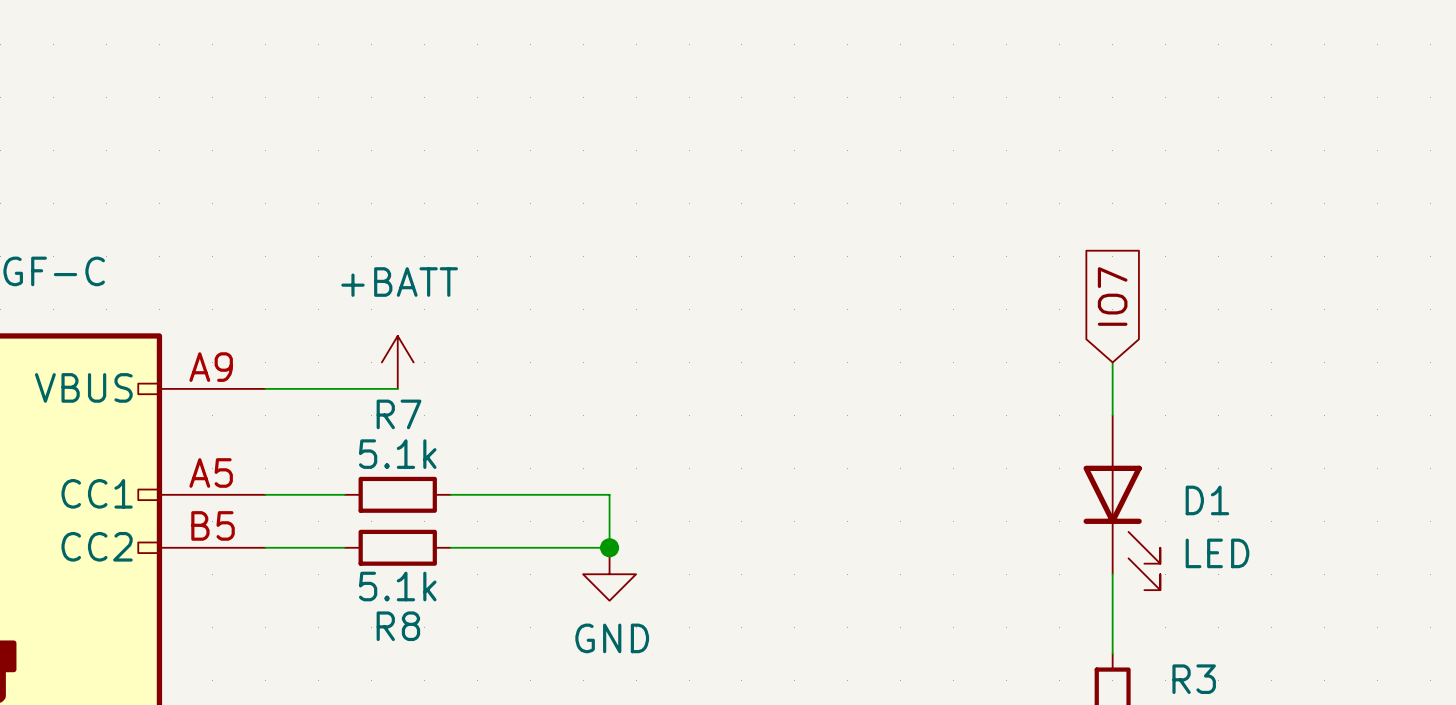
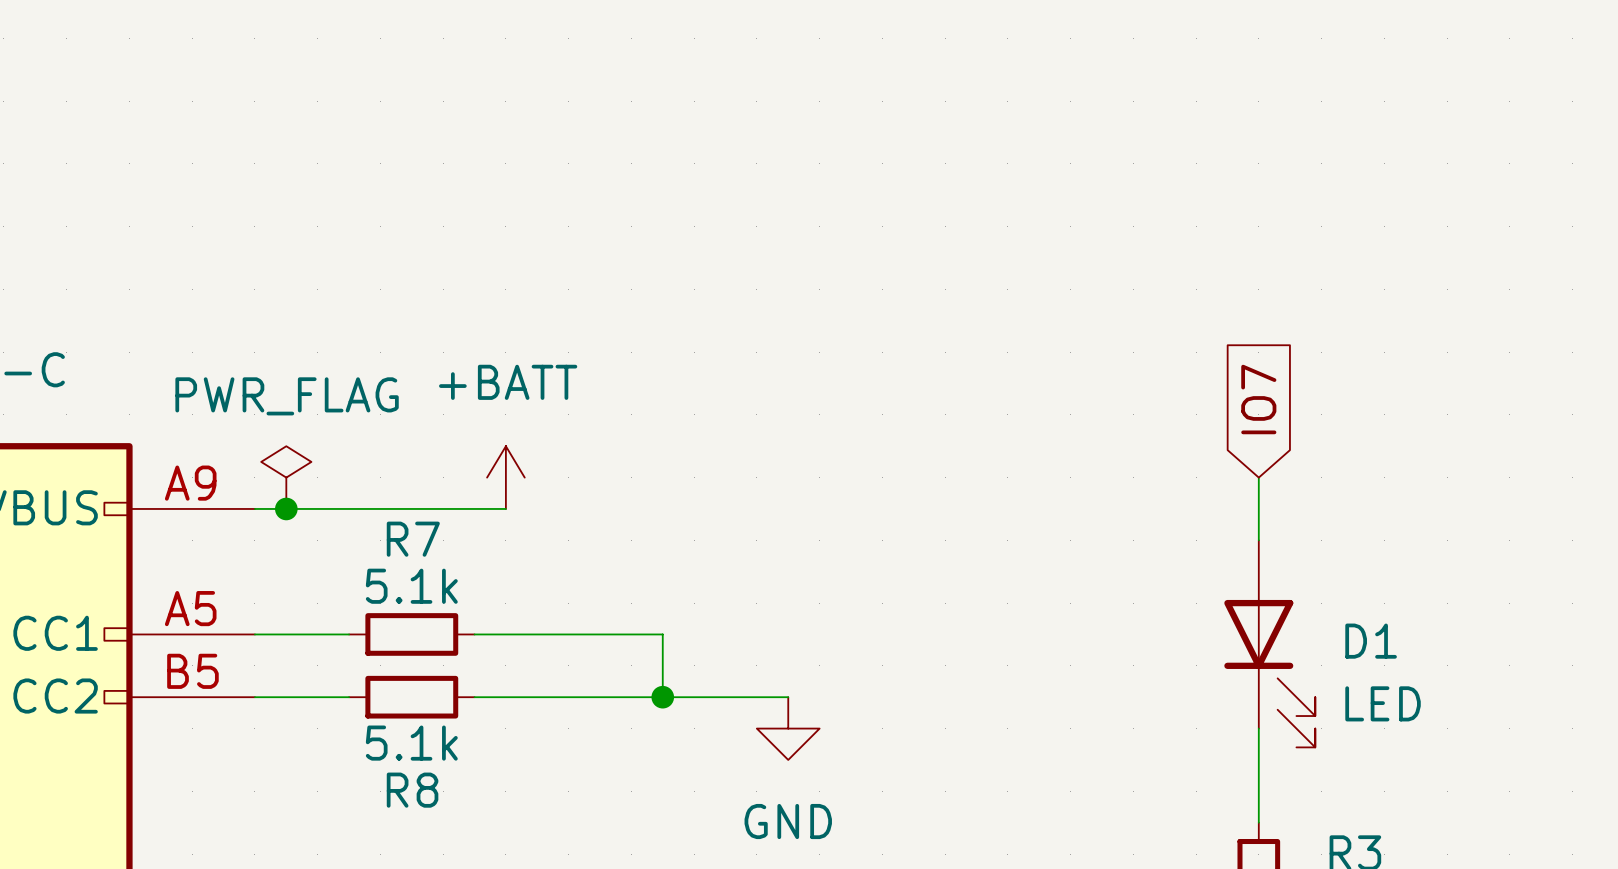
power symbol: none -> PWR_FLAG (286, 477)
power symbol position: +BATT (397, 362) -> +BATT (505, 477)
junction: none -> (286, 508)
wire: none -> (411, 508) (505, 508)
wire: none -> (662, 697) (788, 697)
power symbol position: GND (609, 574) -> GND (788, 728)
power symbol text position: GND (612, 638) -> GND (788, 821)

